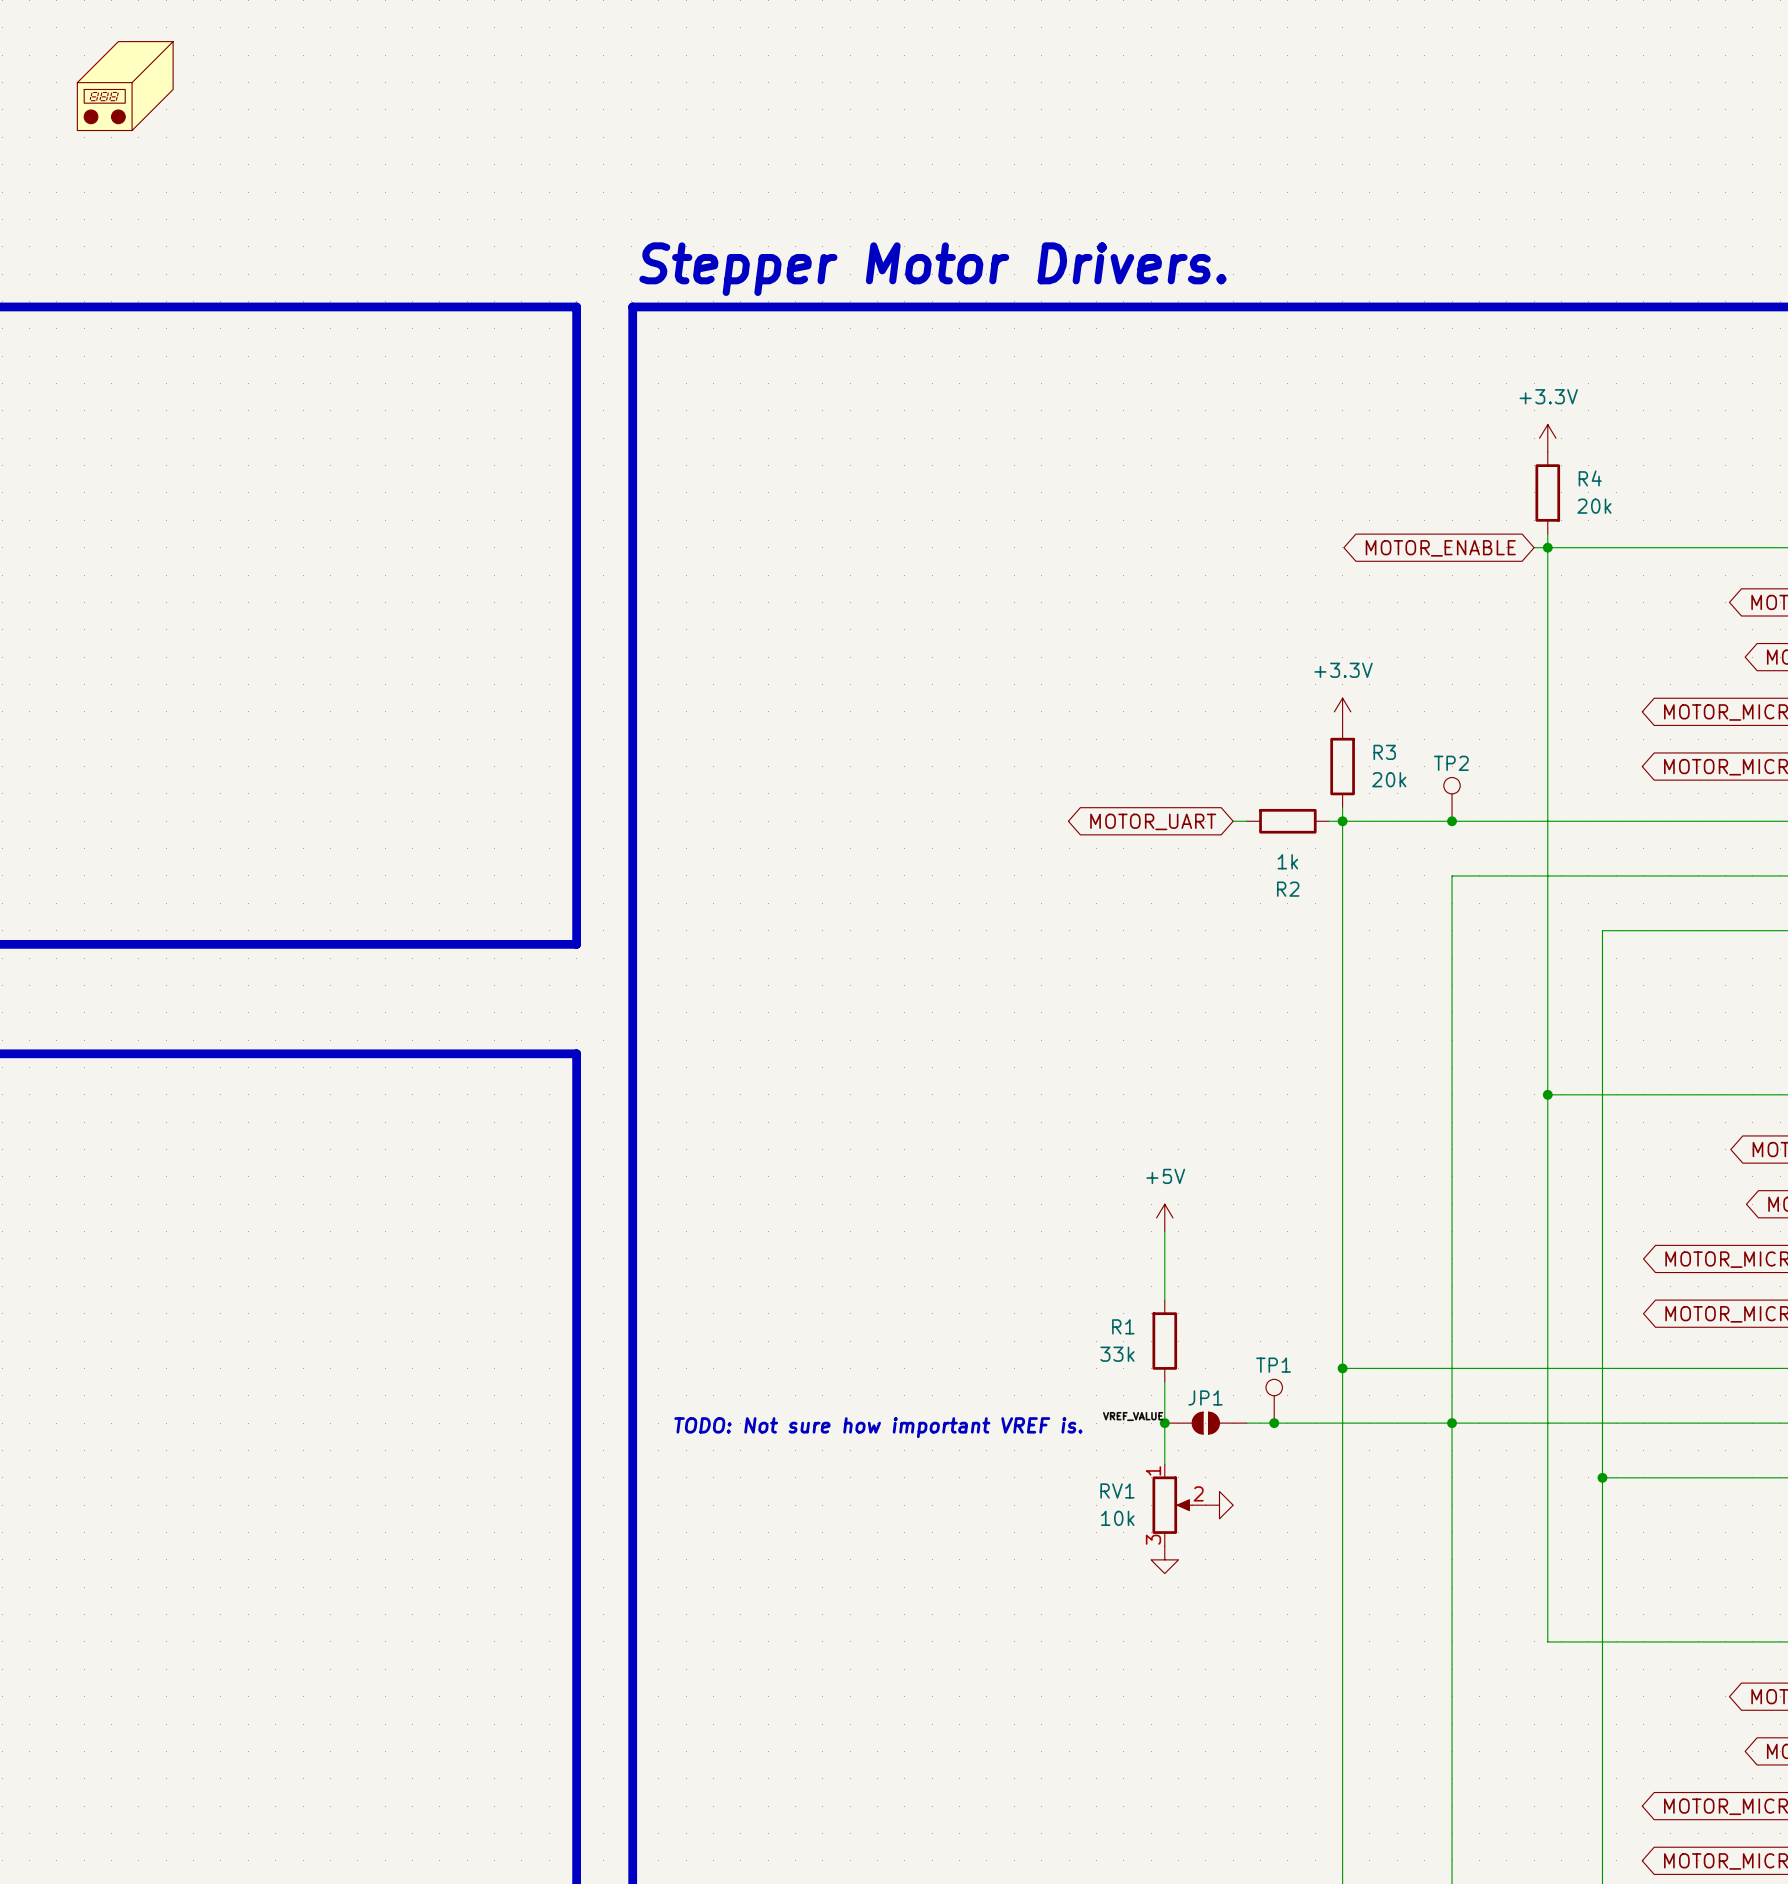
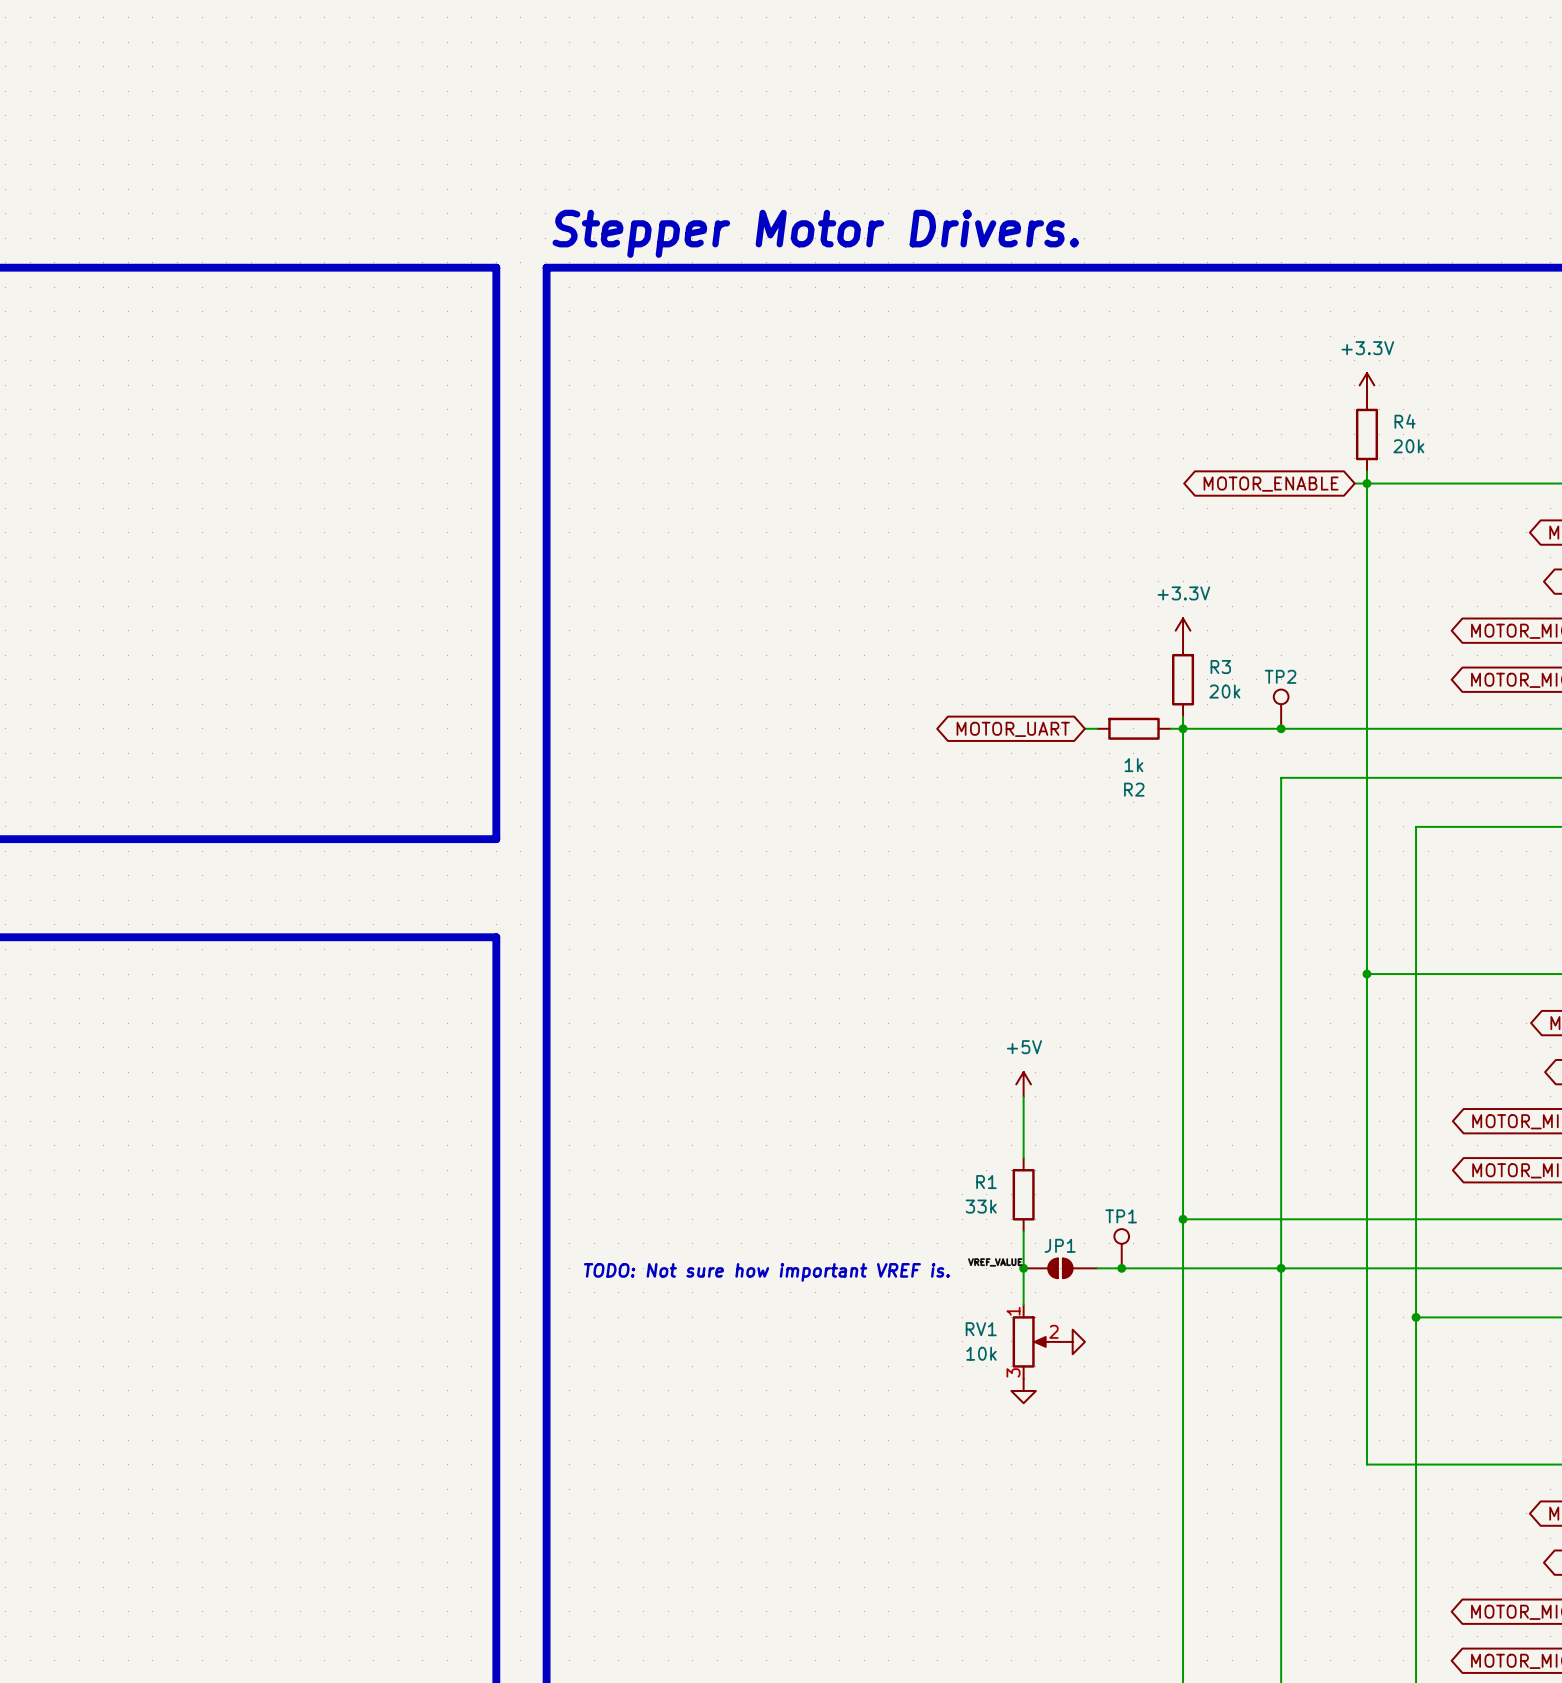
part: (125, 86) -> none

